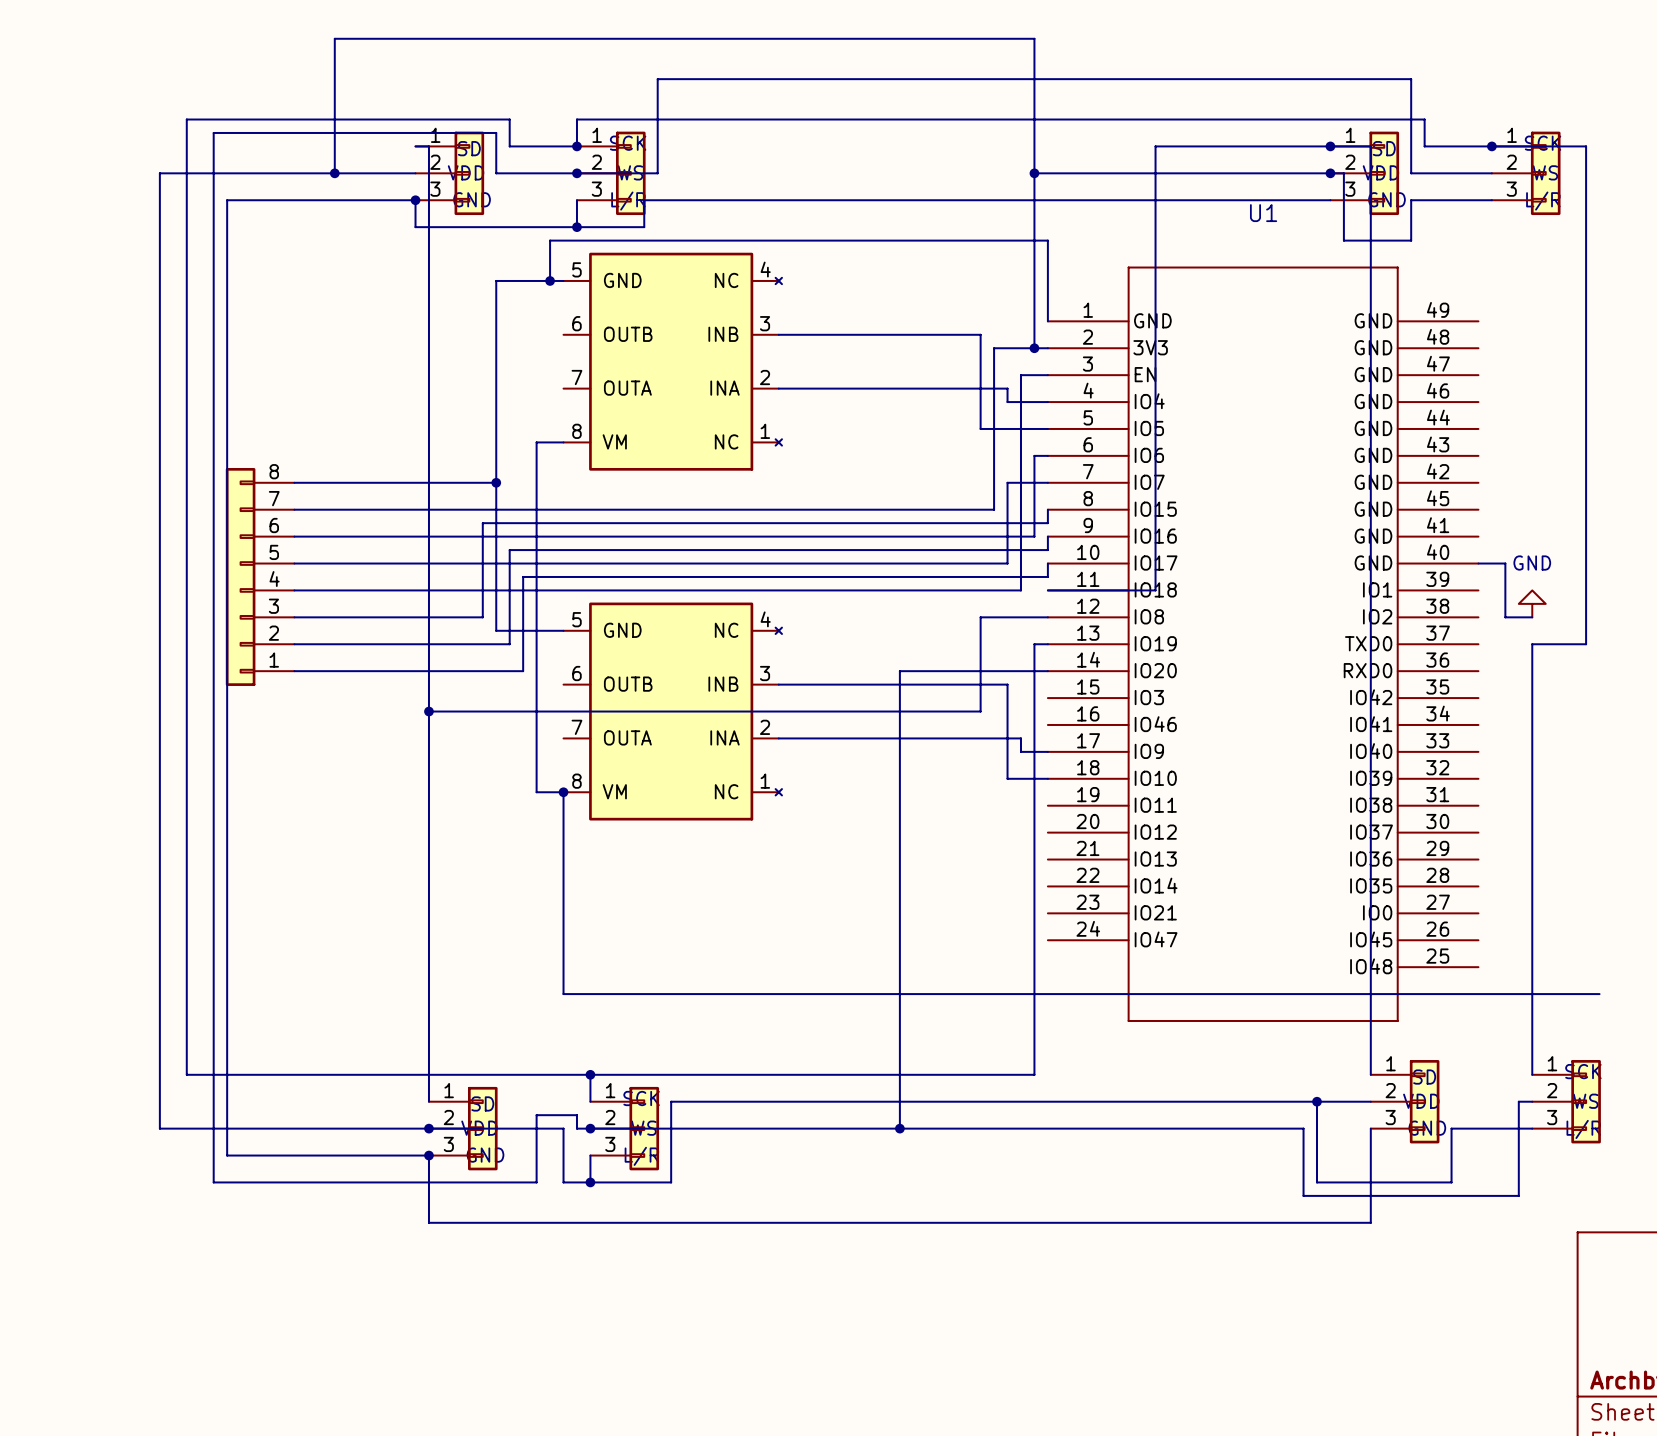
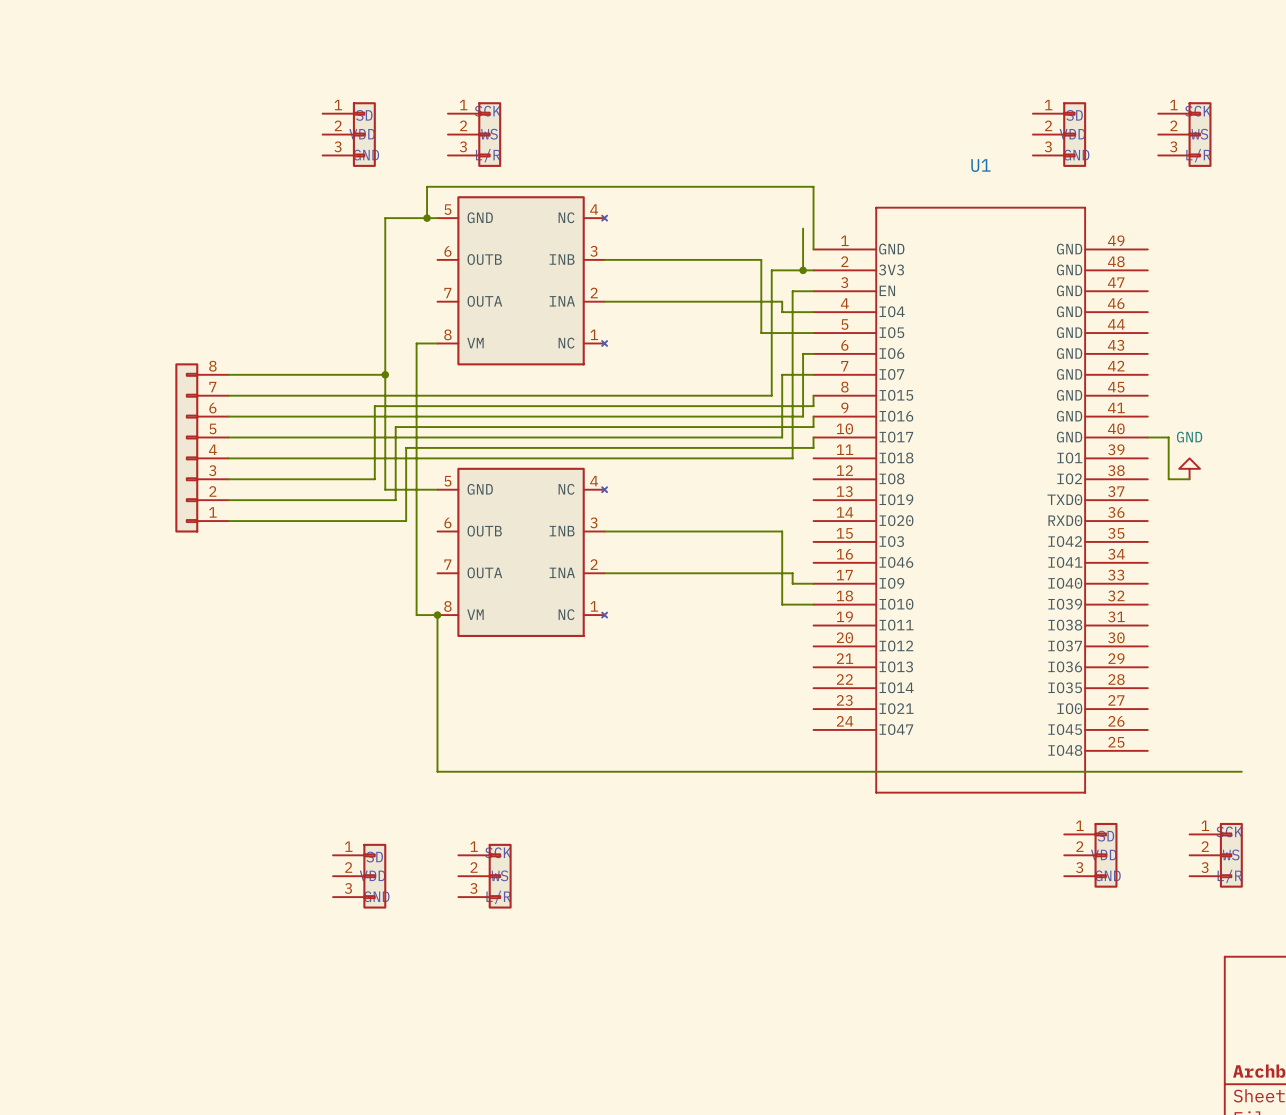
wire: (415, 146) (428, 146) (428, 1101) -> none
junction: (576, 146) -> none
junction: (1330, 146) -> none
junction: (1491, 146) -> none
wire: (334, 173) (334, 38) (1034, 38) (1034, 294) -> none
junction: (334, 173) -> none
wire: (415, 173) (159, 173) (159, 1128) (563, 1128) (563, 1182) (671, 1182) (671, 1101) (1370, 1101) -> none
junction: (576, 173) -> none
wire: (1034, 173) (1343, 173) (1343, 240) (1411, 240) (1411, 200) (1491, 200) -> none
junction: (1034, 173) -> none
junction: (1330, 173) -> none
wire: (1491, 173) (1411, 173) (1411, 79) (657, 79) (657, 173) (496, 173) (496, 132) (213, 132) (213, 1182) (536, 1182) (536, 1115) (576, 1115) (576, 1128) (1303, 1128) (1303, 1195) (1518, 1195) (1518, 1101) (1532, 1101) -> none
junction: (415, 200) -> none
wire: (576, 200) (576, 227) -> none
wire: (1330, 200) (644, 200) (644, 227) (415, 227) (415, 200) (227, 200) (227, 1155) (428, 1155) (428, 1222) (1370, 1222) (1370, 1128) -> none
junction: (576, 227) -> none
wire: (1047, 590) (1155, 590) (1155, 146) (1370, 146) (1370, 1074) -> none
wire: (1047, 617) (980, 617) (980, 711) (428, 711) -> none
wire: (1047, 644) (1034, 644) (1034, 1074) (186, 1074) (186, 119) (509, 119) (509, 146) (576, 146) (576, 119) (1424, 119) (1424, 146) (1586, 146) (1586, 644) (1532, 644) (1532, 1074) -> none
wire: (1047, 671) (899, 671) (899, 1128) -> none
junction: (428, 711) -> none
wire: (590, 1074) (590, 1101) -> none
junction: (590, 1074) -> none
wire: (1316, 1101) (1316, 1182) (1451, 1182) (1451, 1128) (1532, 1128) -> none
junction: (1316, 1101) -> none
junction: (428, 1128) -> none
junction: (590, 1128) -> none
junction: (899, 1128) -> none
junction: (428, 1155) -> none
wire: (590, 1155) (590, 1182) -> none
junction: (590, 1182) -> none

